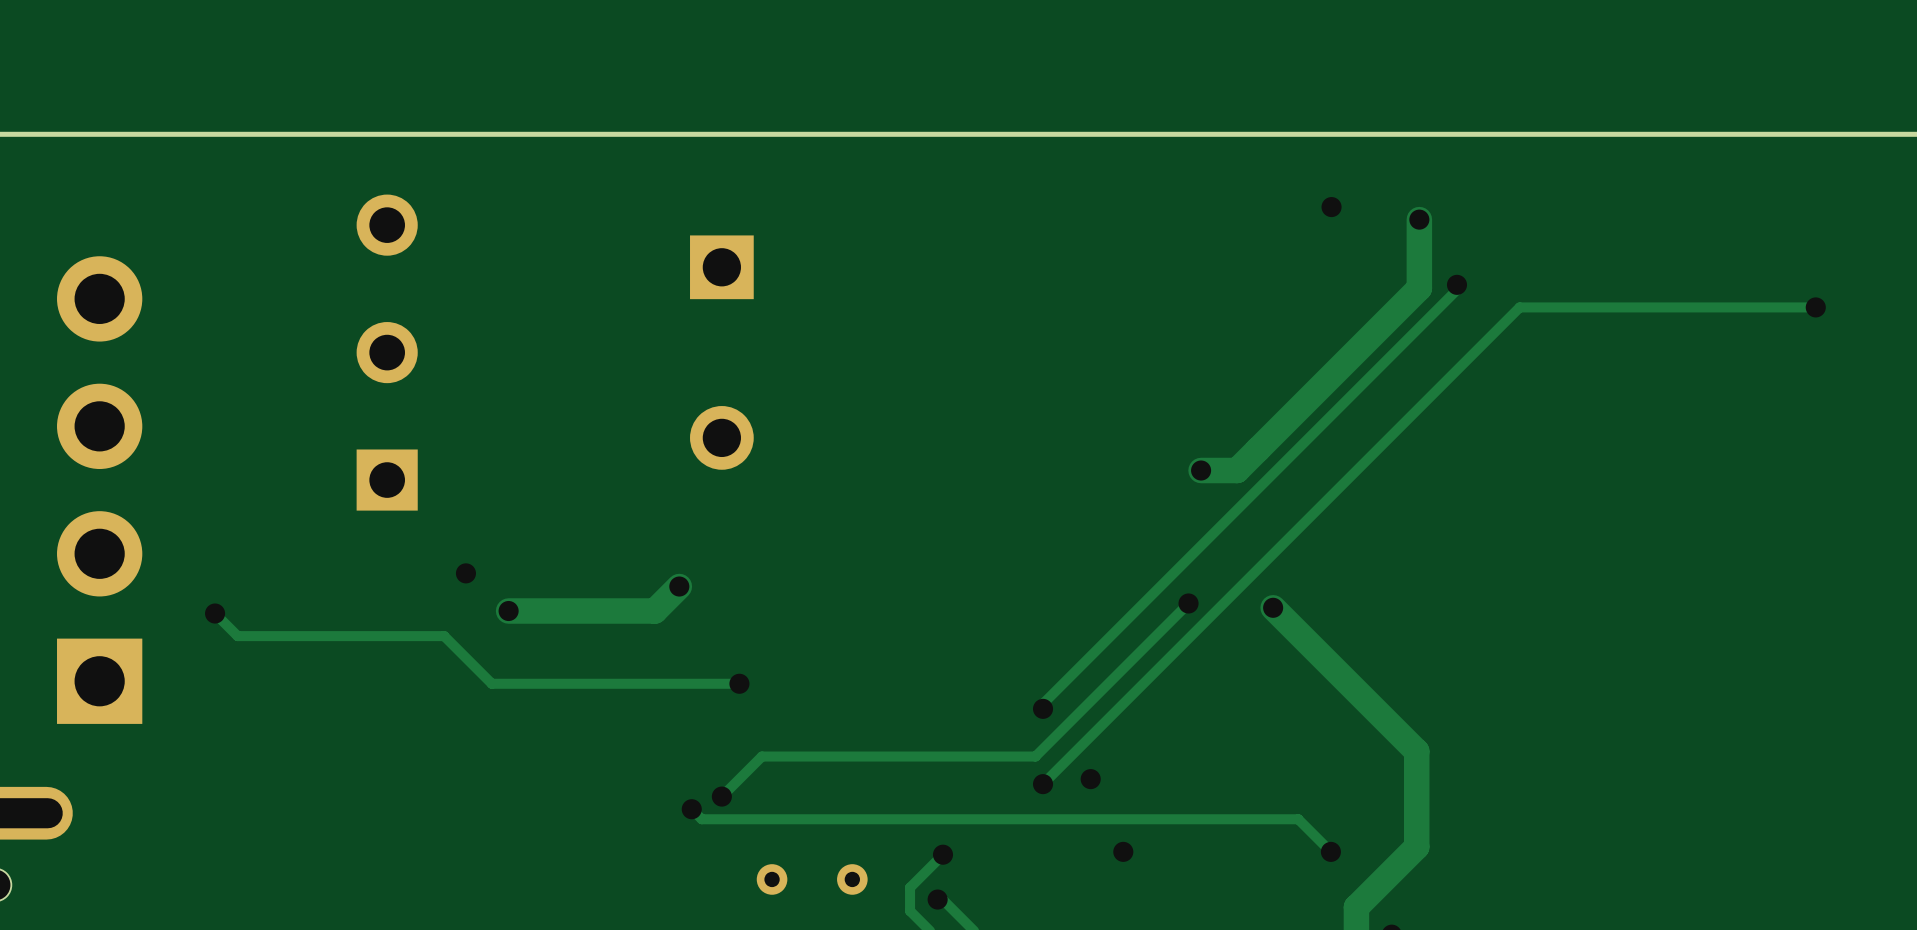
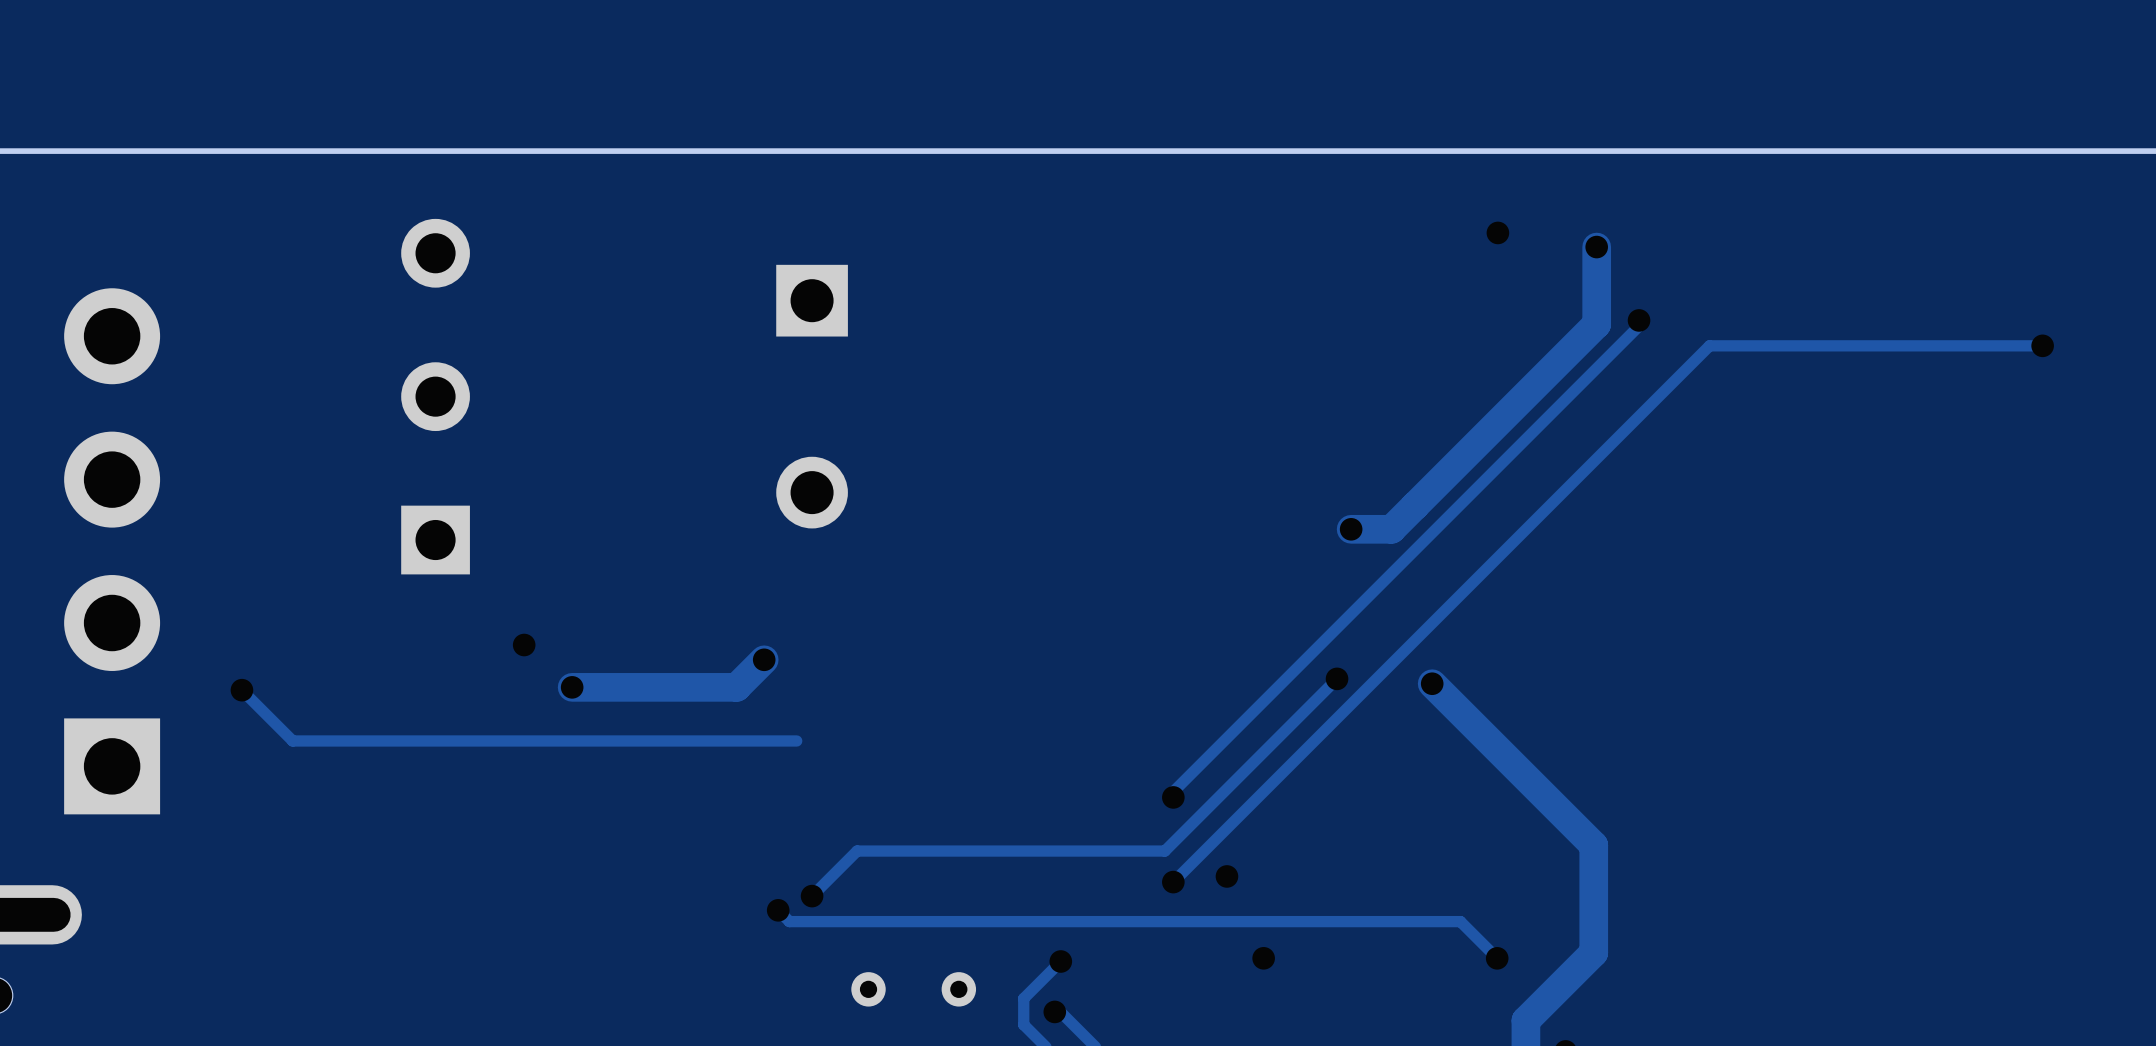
track: (237, 636) (444, 636) (491, 683) (739, 683) -> (267, 715) (292, 740) (796, 740)
via: (739, 683) -> none

